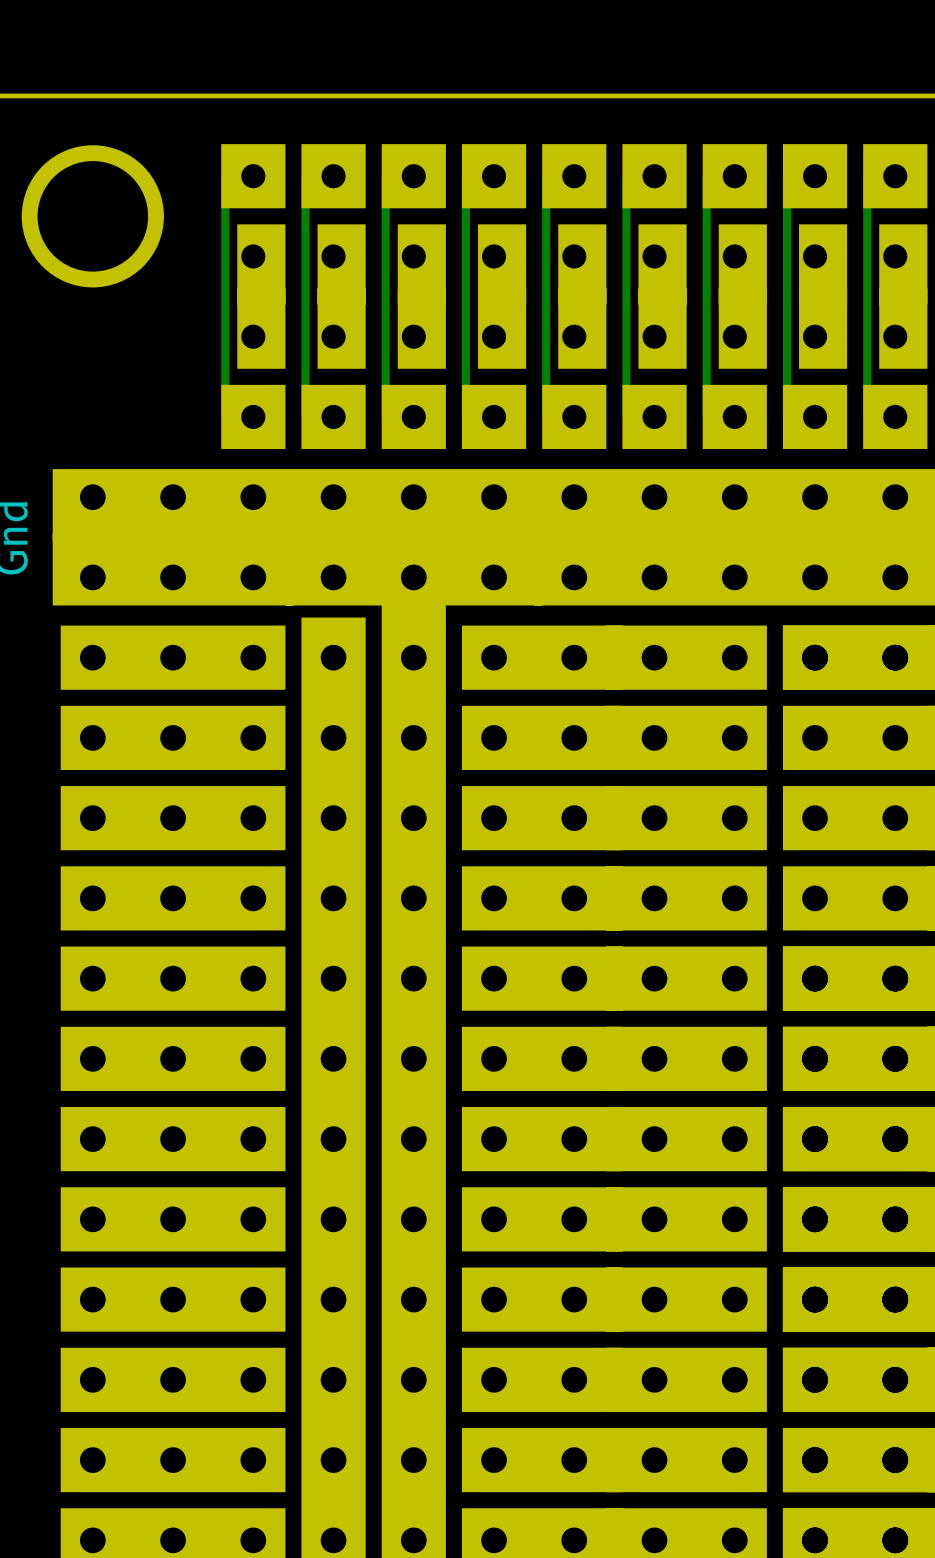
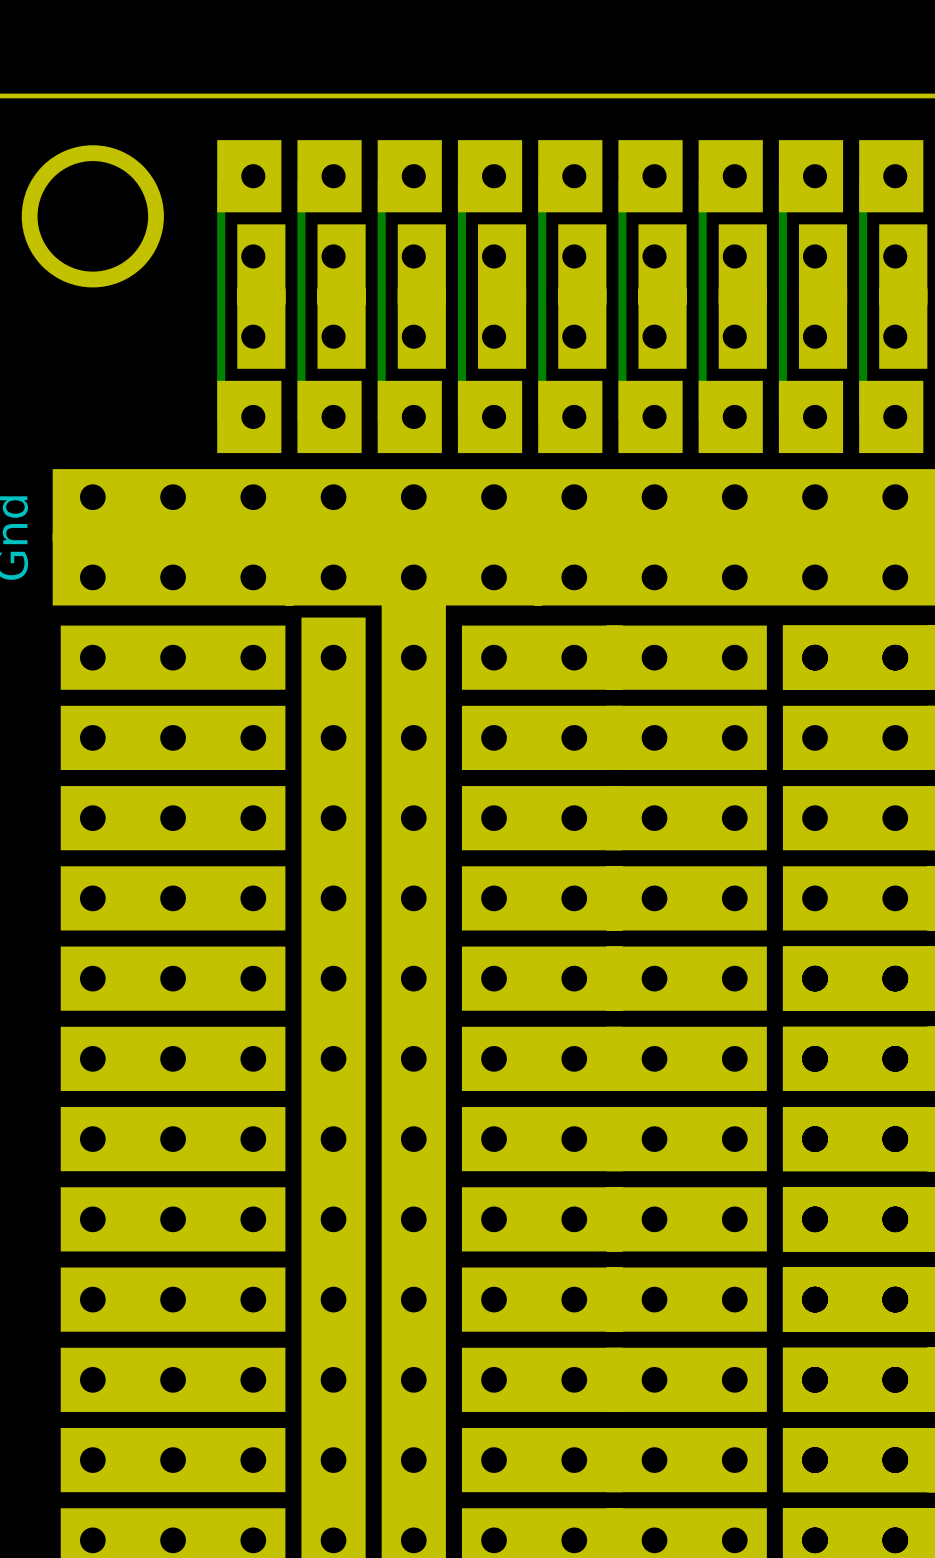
part footprint: [221, 144, 286, 450] -> [217, 140, 286, 454]
part footprint: [301, 144, 366, 450] -> [297, 140, 366, 454]
part footprint: [381, 144, 446, 450] -> [377, 140, 446, 454]
part footprint: [461, 144, 527, 450] -> [457, 140, 527, 454]
part footprint: [542, 144, 607, 450] -> [538, 140, 607, 454]
part footprint: [622, 144, 687, 450] -> [618, 140, 687, 454]
part footprint: [702, 144, 767, 450] -> [698, 140, 767, 454]
part footprint: [782, 144, 848, 450] -> [778, 140, 848, 454]
part footprint: [863, 144, 928, 450] -> [859, 140, 928, 454]

